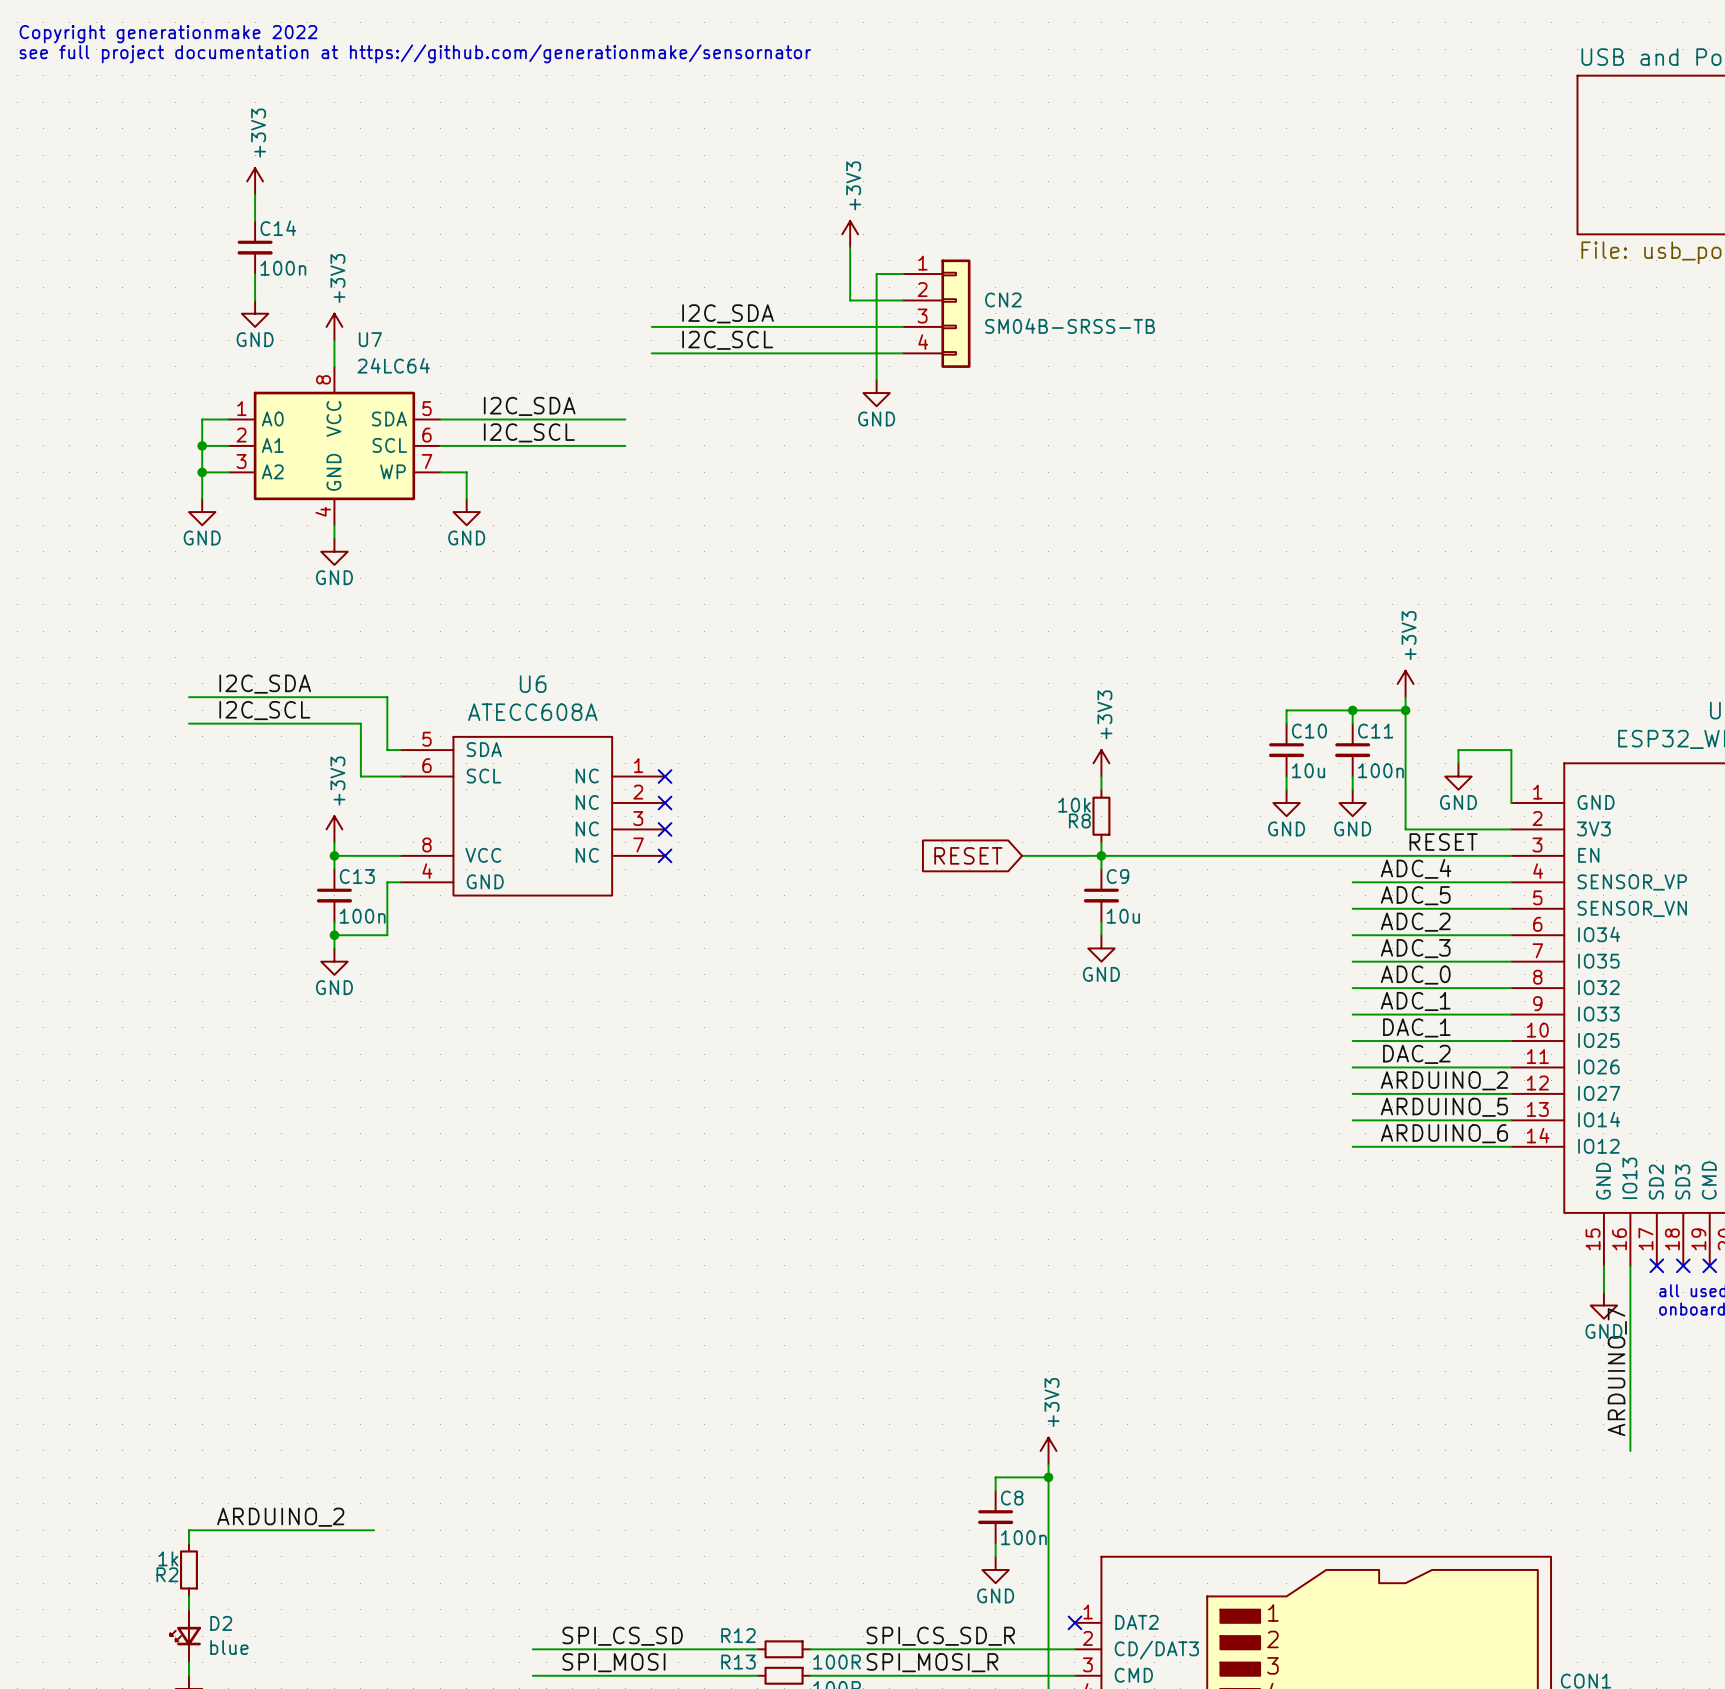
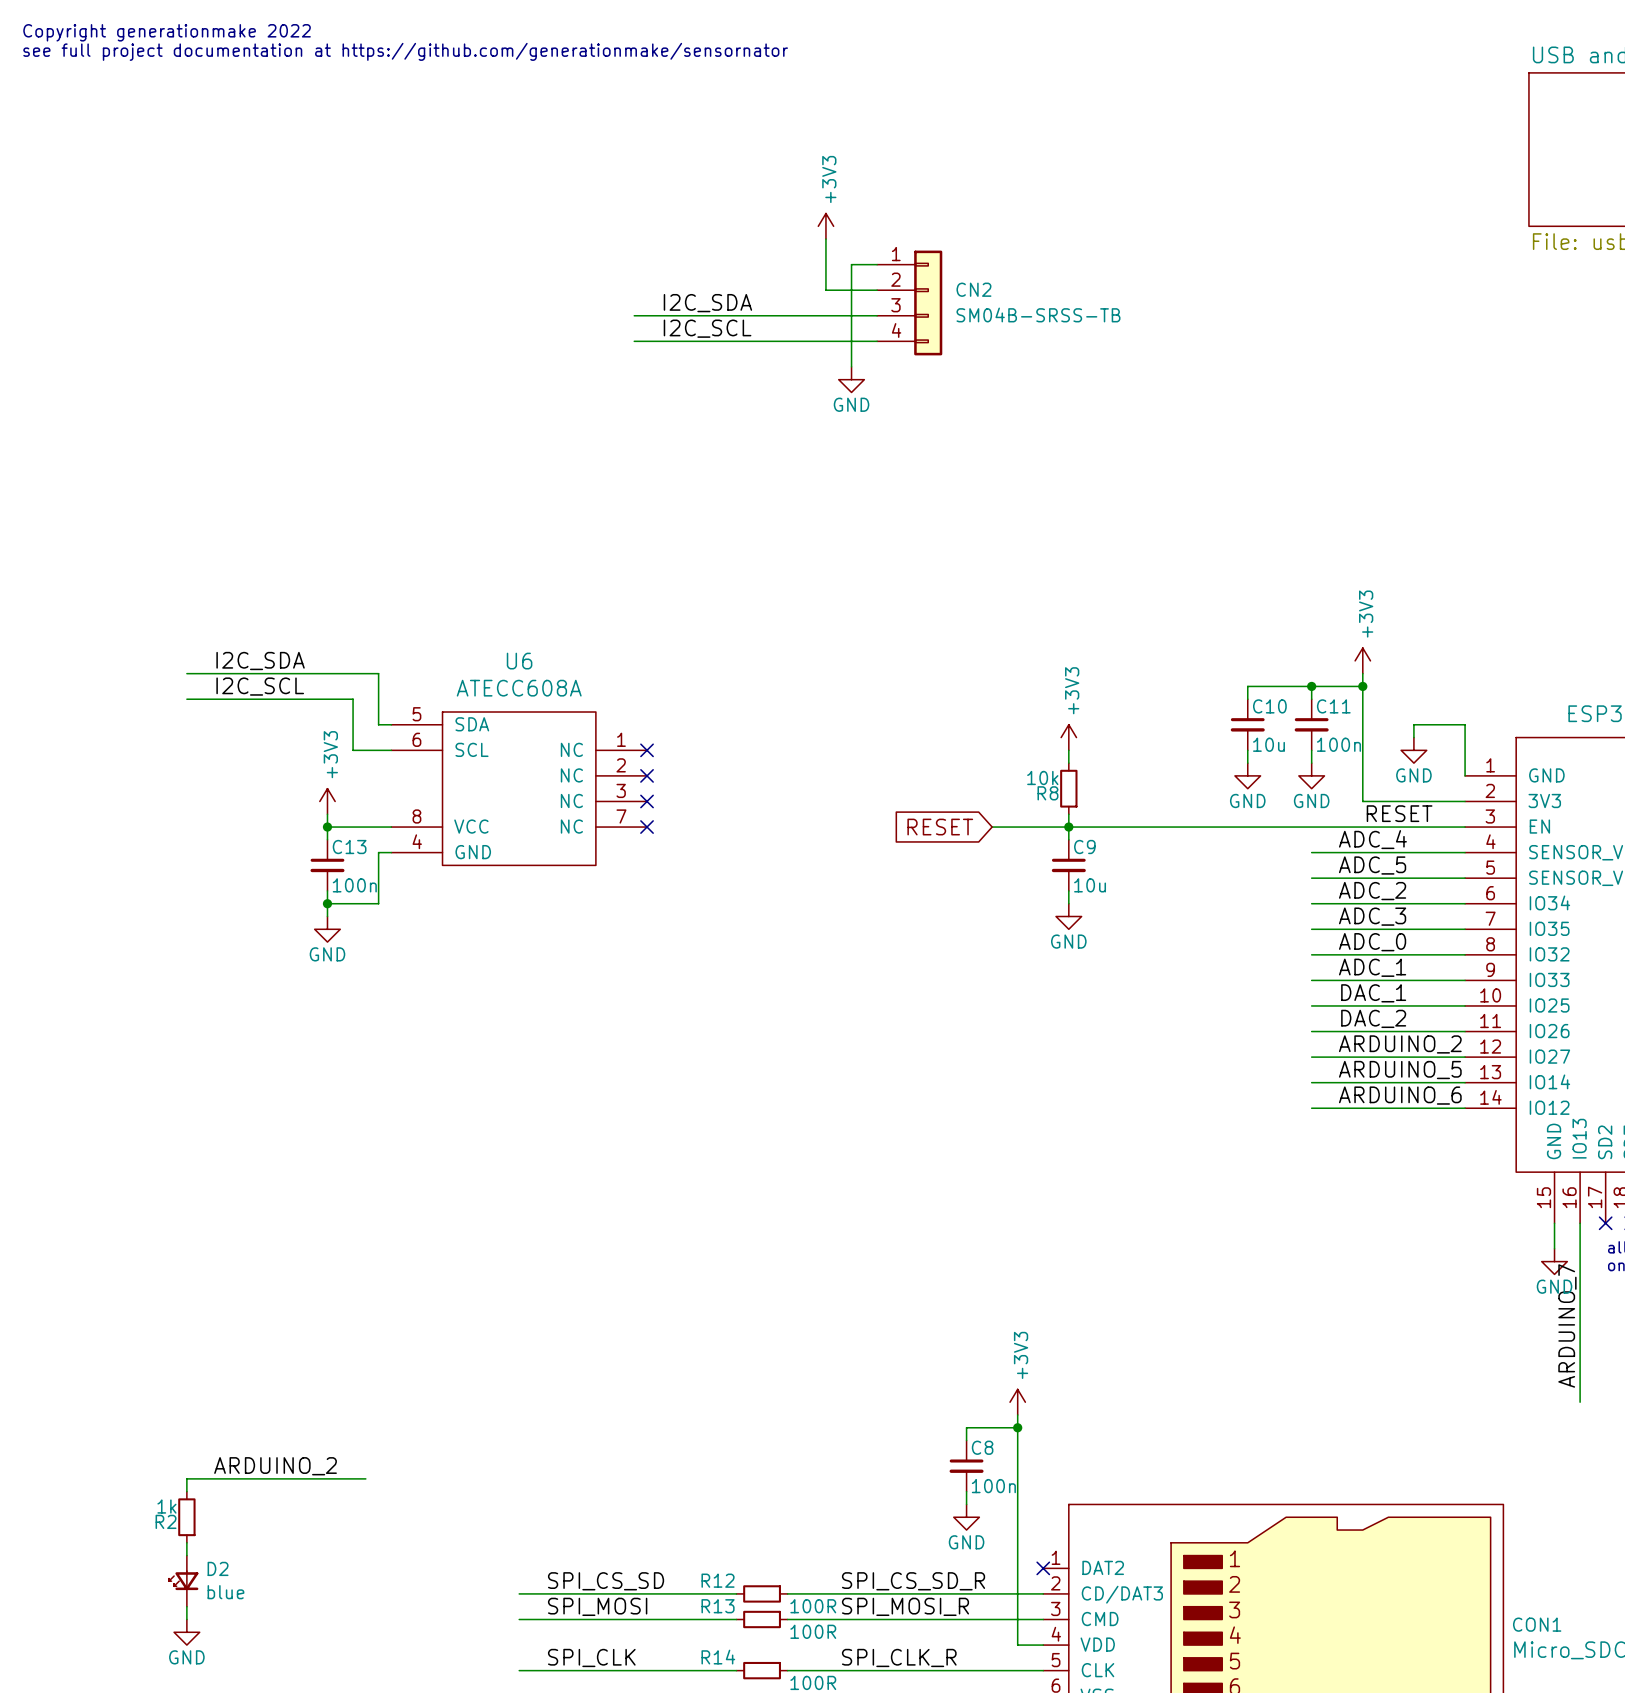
power symbol: +3V3 (255, 181) -> none
wire: (255, 194) (255, 221) -> none
C14: 100n (255, 247) -> none
wire: (255, 274) (255, 300) -> none
power symbol: GND (255, 313) -> none
power symbol: +3V3 (334, 326) -> none
wire: (334, 340) (334, 366) -> none
label: I2C_SDA (529, 406) -> none
wire: (228, 419) (202, 419) (202, 498) -> none
wire: (440, 419) (625, 419) -> none
label: I2C_SCL (529, 432) -> none
wire: (202, 445) (228, 445) -> none
junction: (202, 445) -> none
U7: 24LC64 (334, 445) -> none
wire: (440, 445) (625, 445) -> none
wire: (202, 472) (228, 472) -> none
junction: (202, 472) -> none
wire: (440, 472) (466, 472) (466, 498) -> none
power symbol: GND (202, 512) -> none
power symbol: GND (466, 512) -> none
wire: (334, 525) (334, 538) -> none
power symbol: GND (334, 551) -> none

